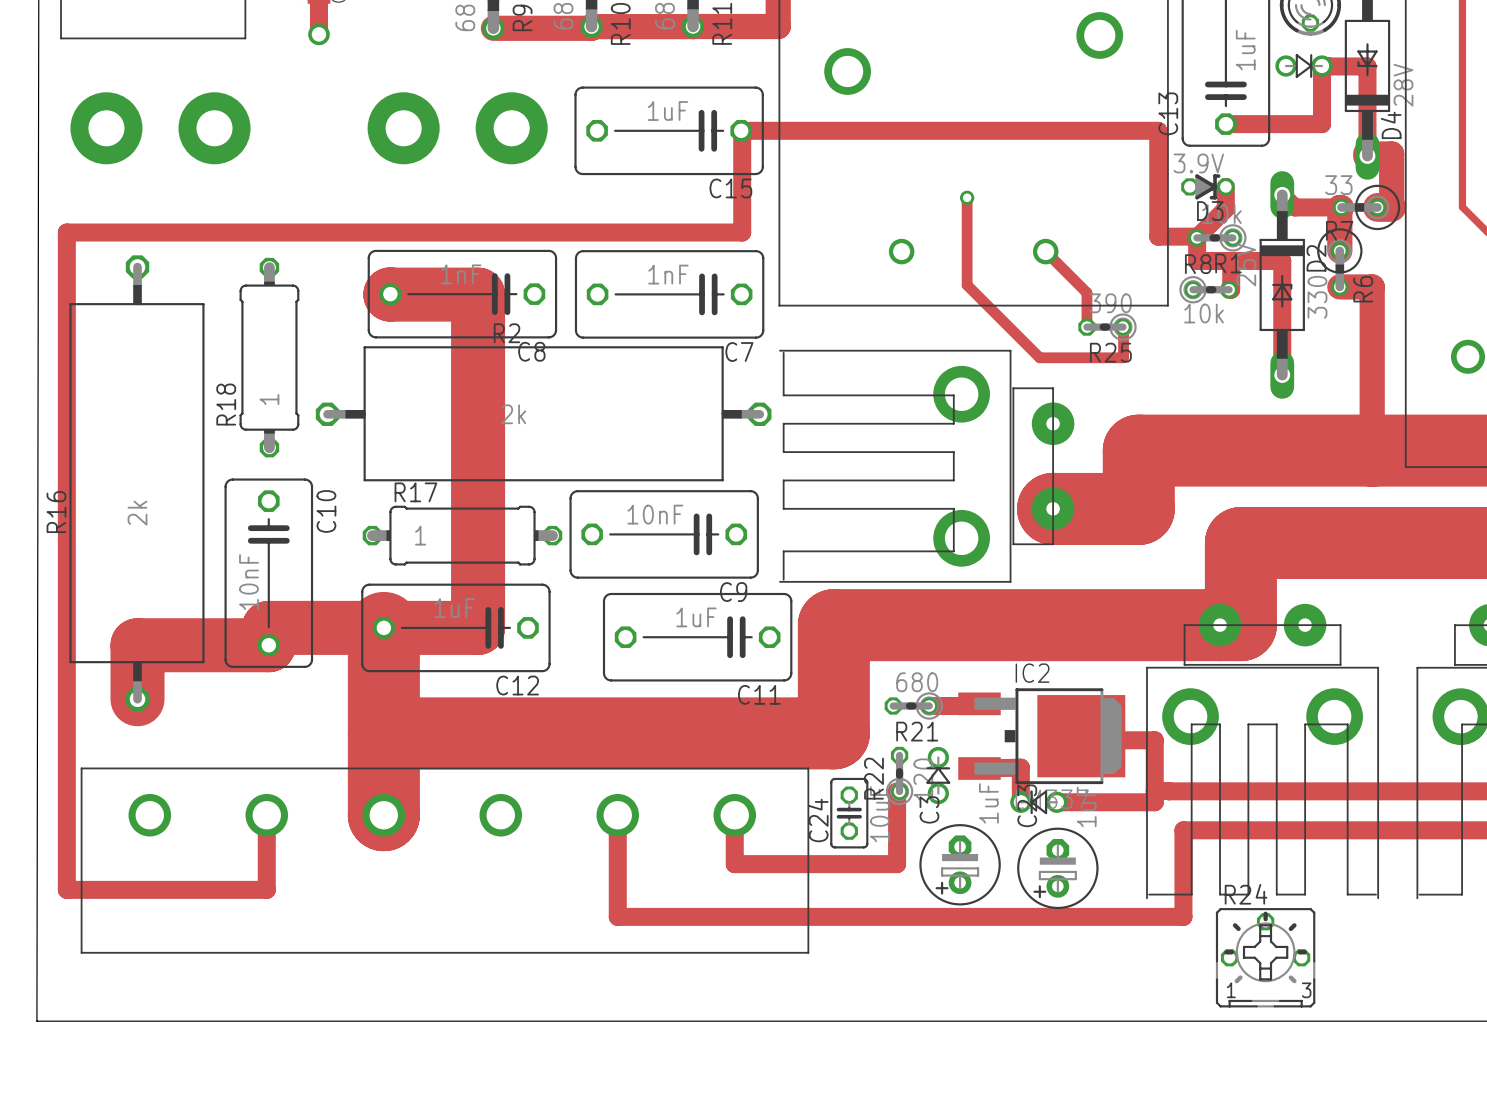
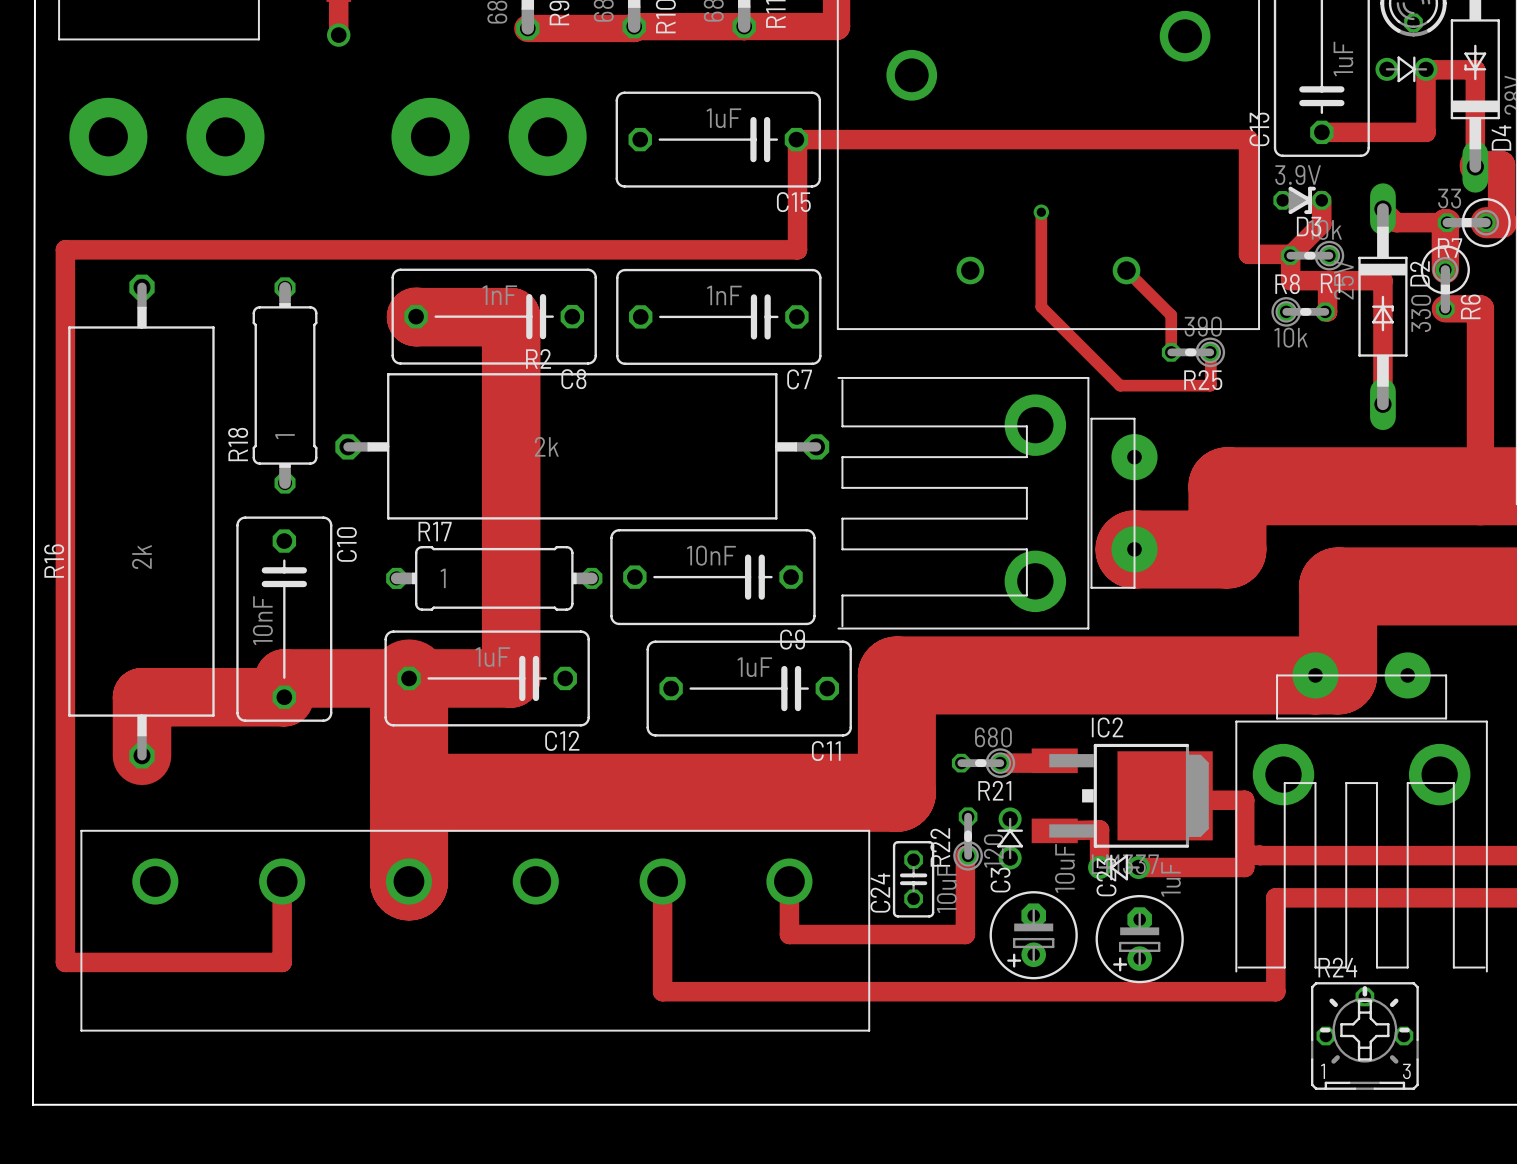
C3 value: 1uF (988, 803) -> 10uF (1064, 868)

